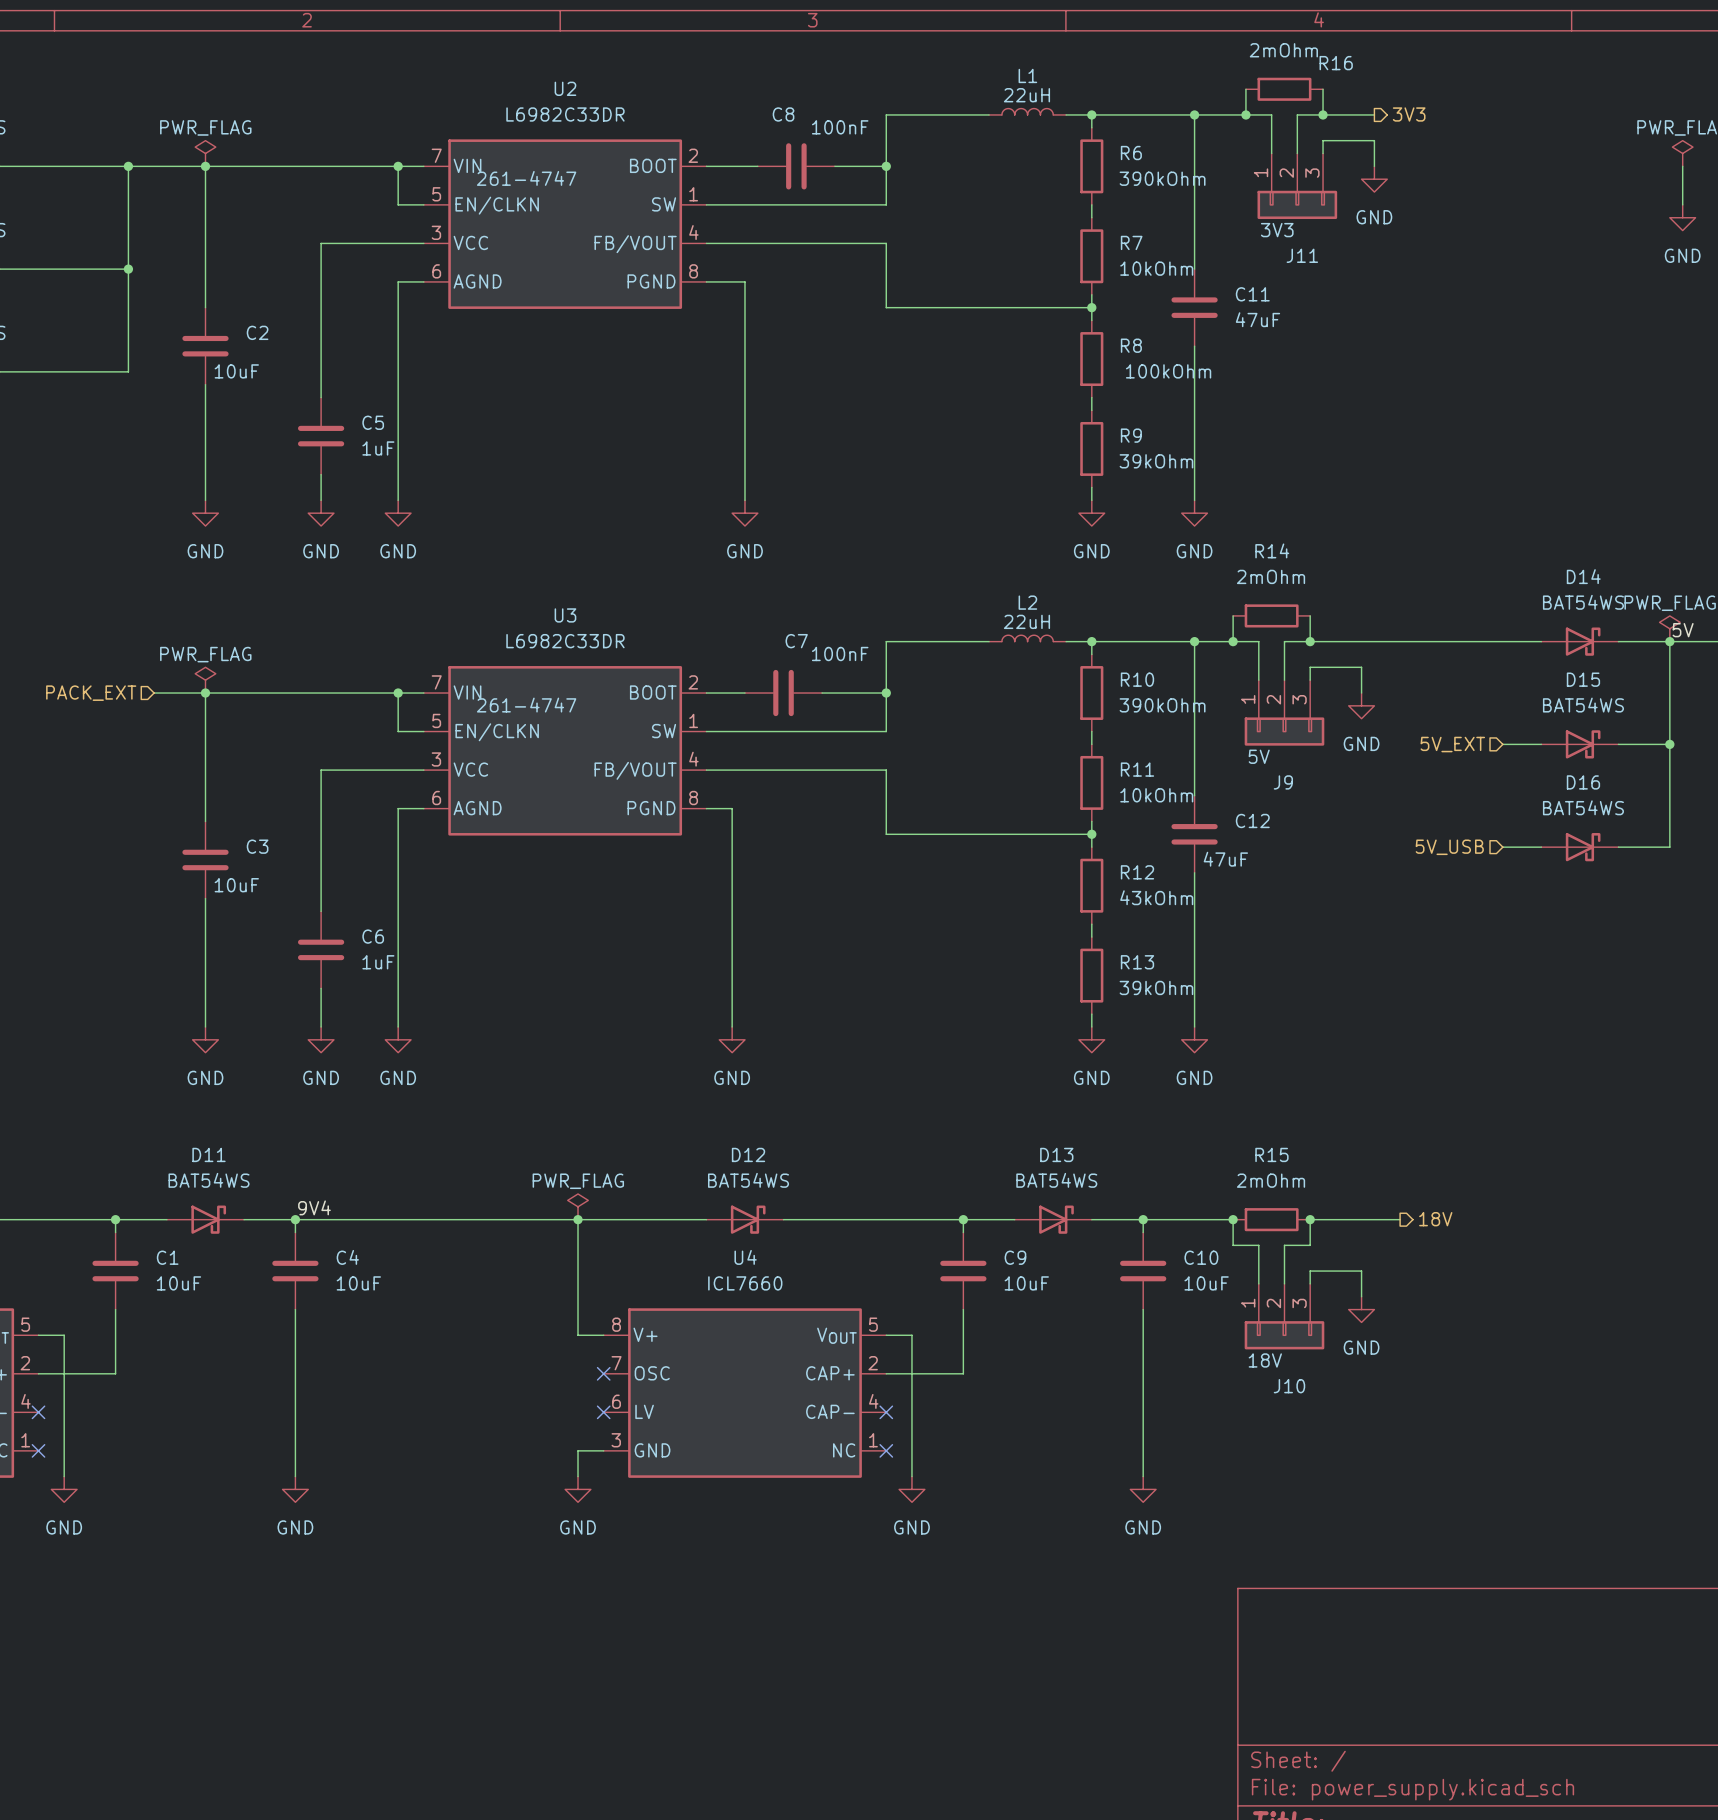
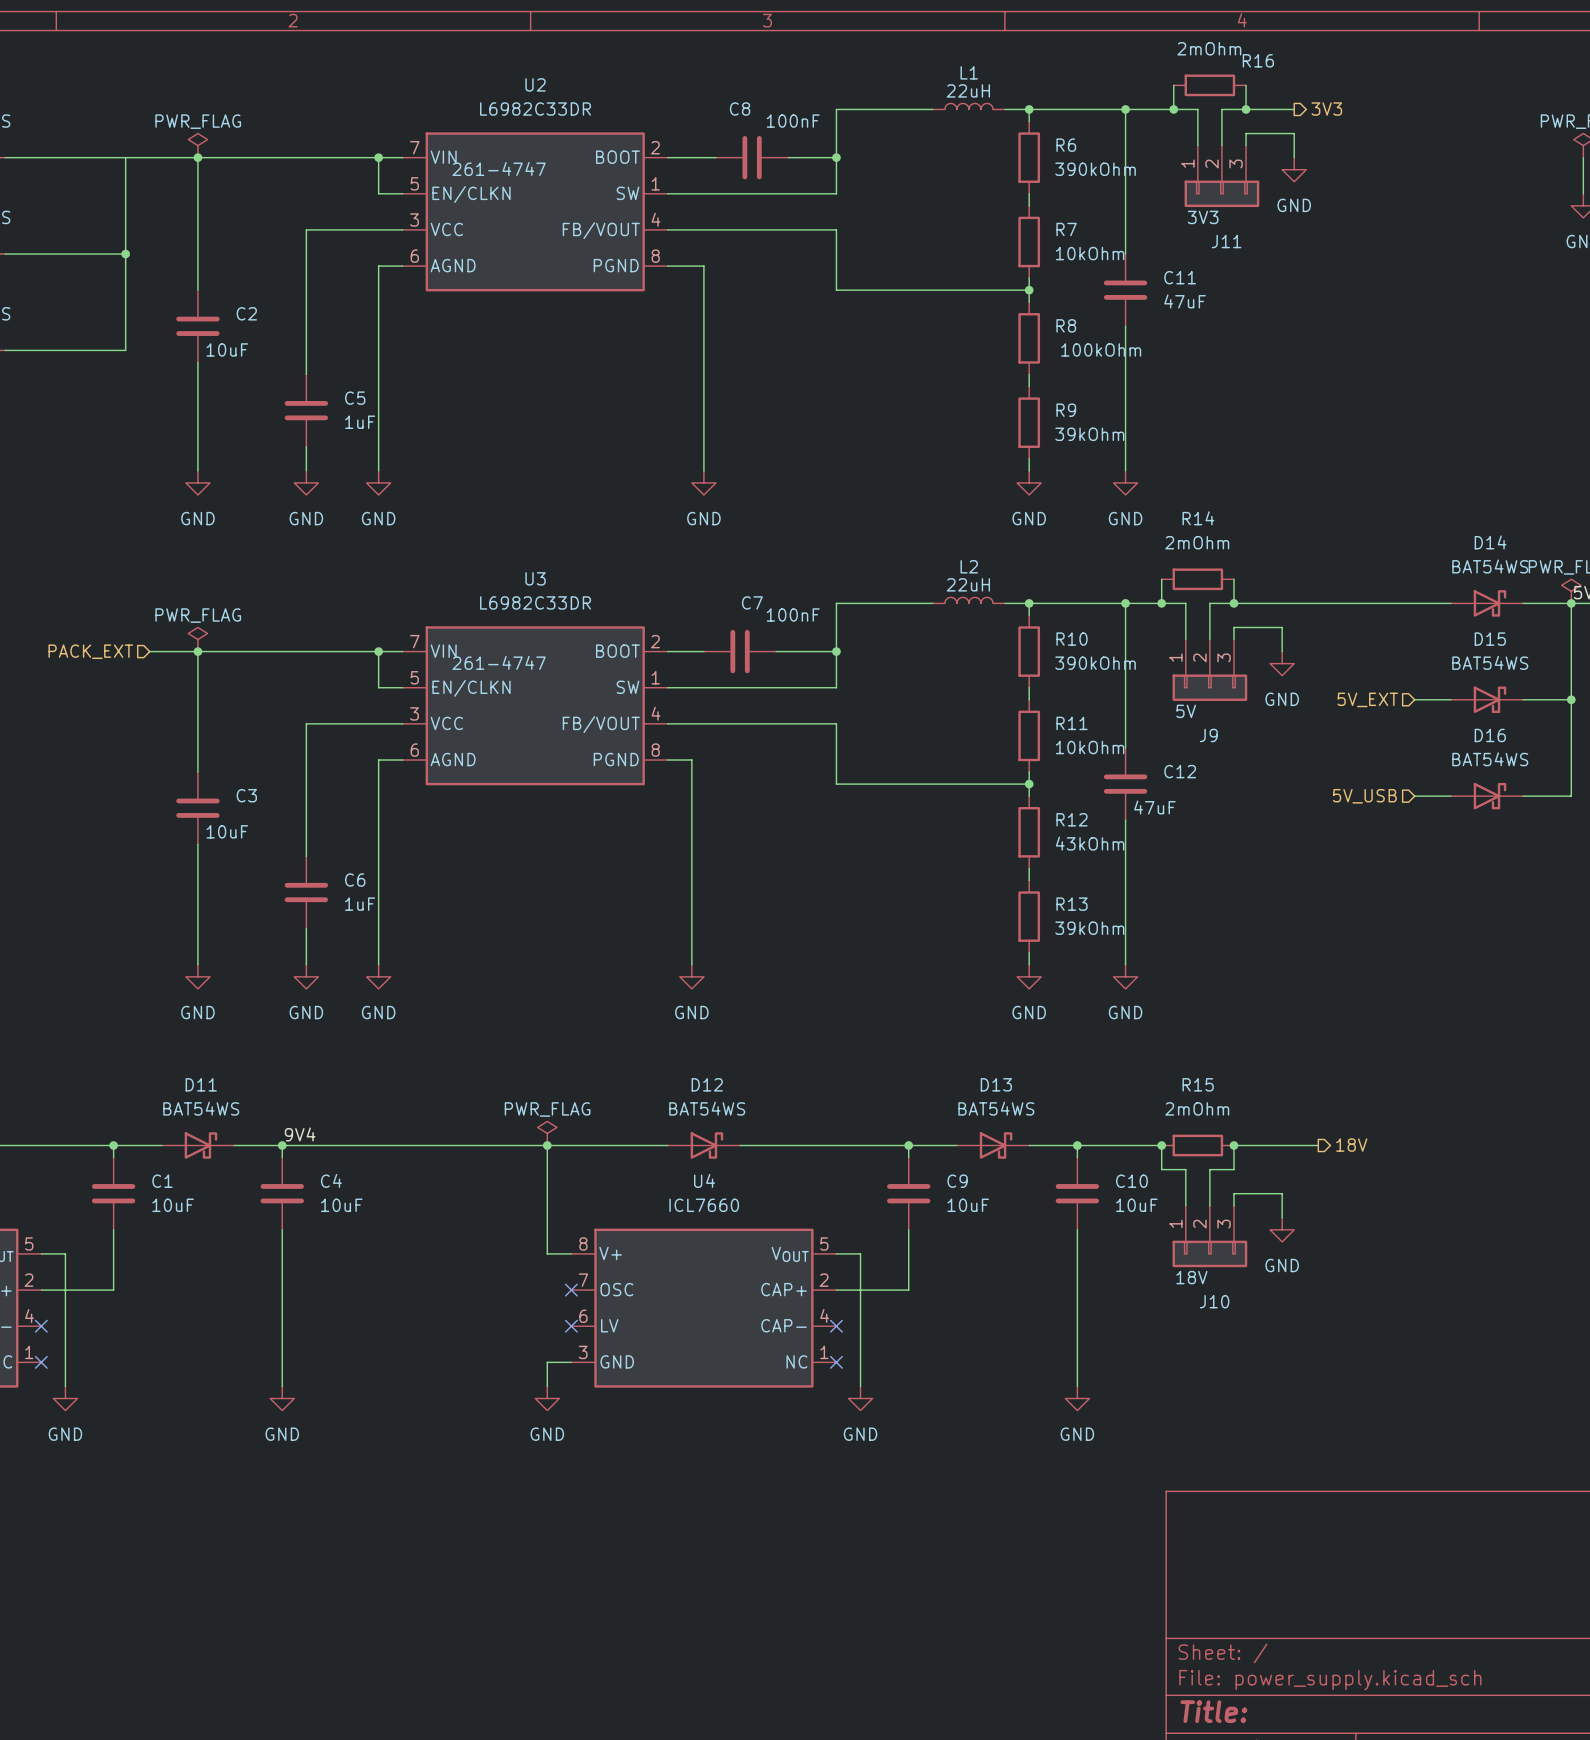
junction: (128, 166) -> none

